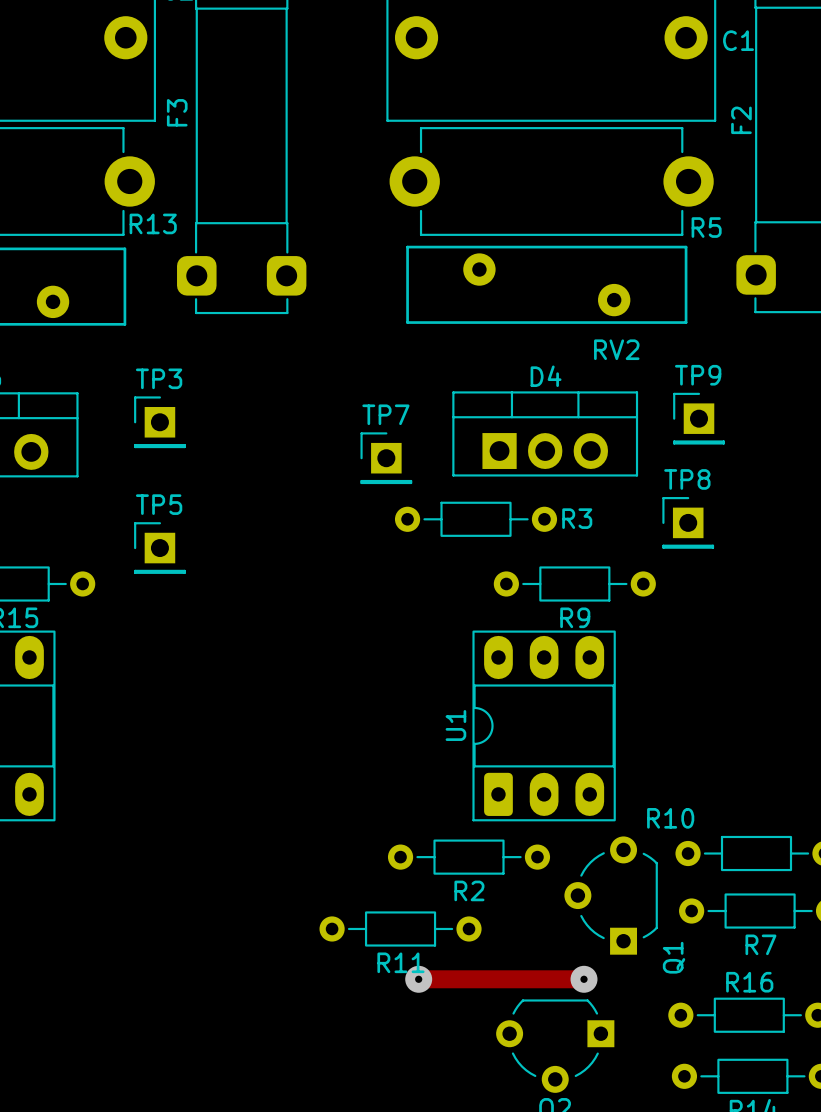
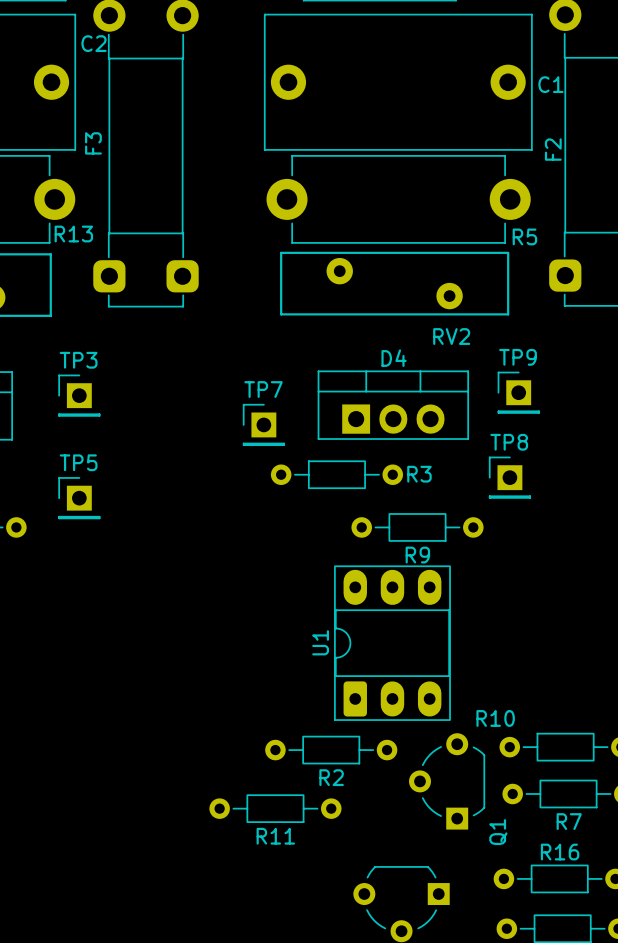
track: (418, 979) (584, 979) -> none
via: (418, 979) -> none
via: (584, 979) -> none

